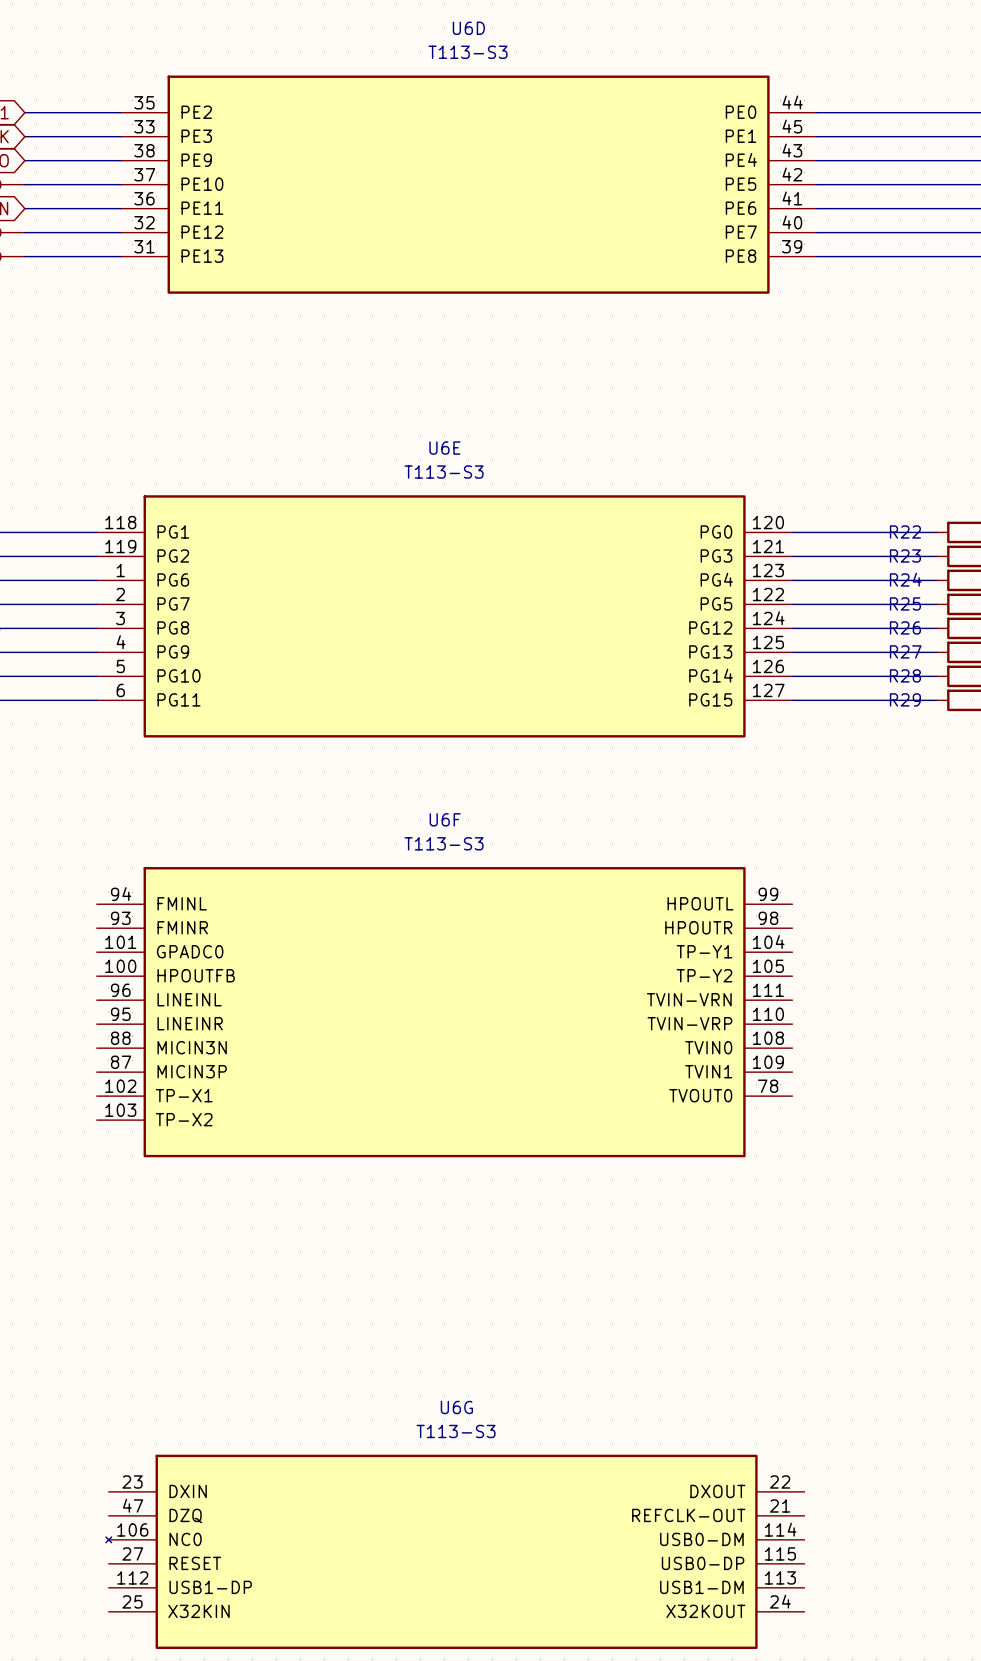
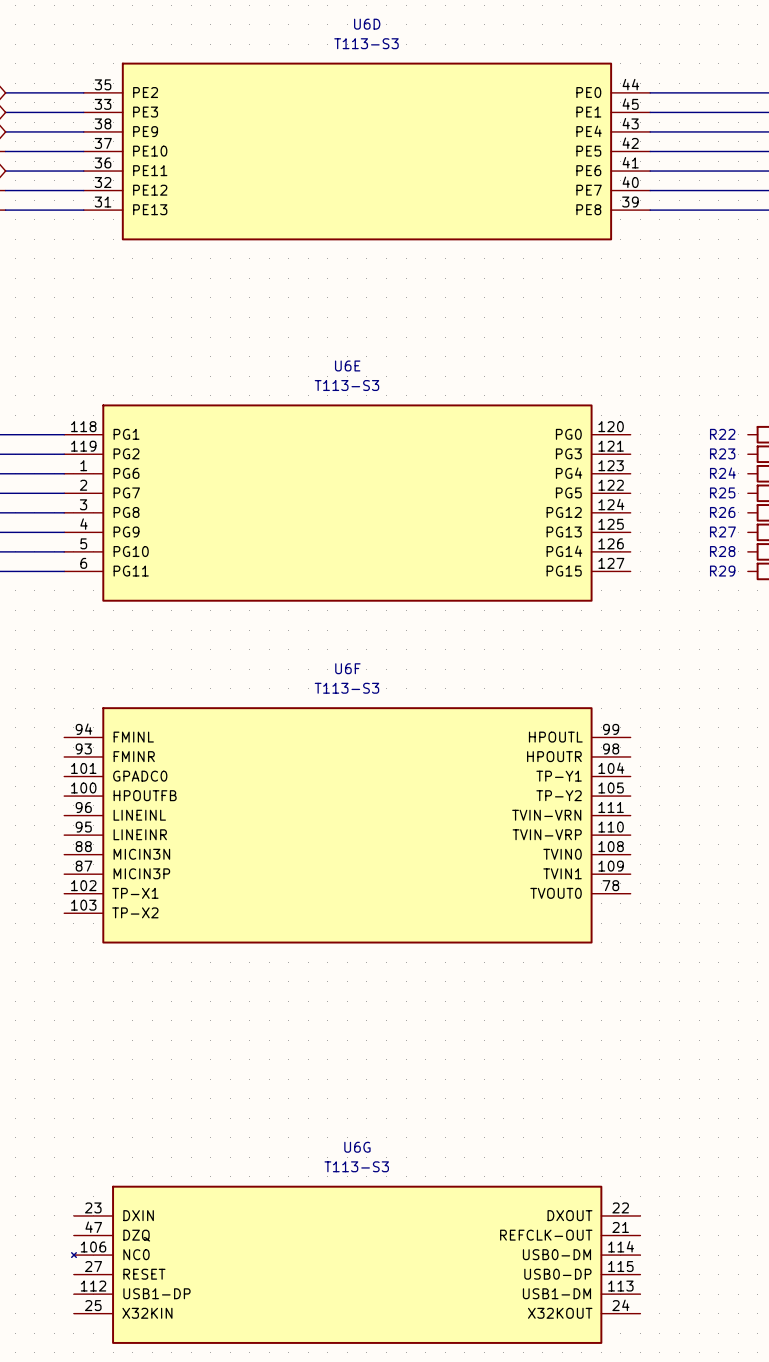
wire: (792, 532) (936, 532) -> none
wire: (792, 556) (936, 556) -> none
wire: (792, 580) (936, 580) -> none
wire: (792, 604) (936, 604) -> none
wire: (792, 628) (936, 628) -> none
wire: (792, 652) (936, 652) -> none
wire: (792, 676) (936, 676) -> none
wire: (792, 700) (936, 700) -> none

